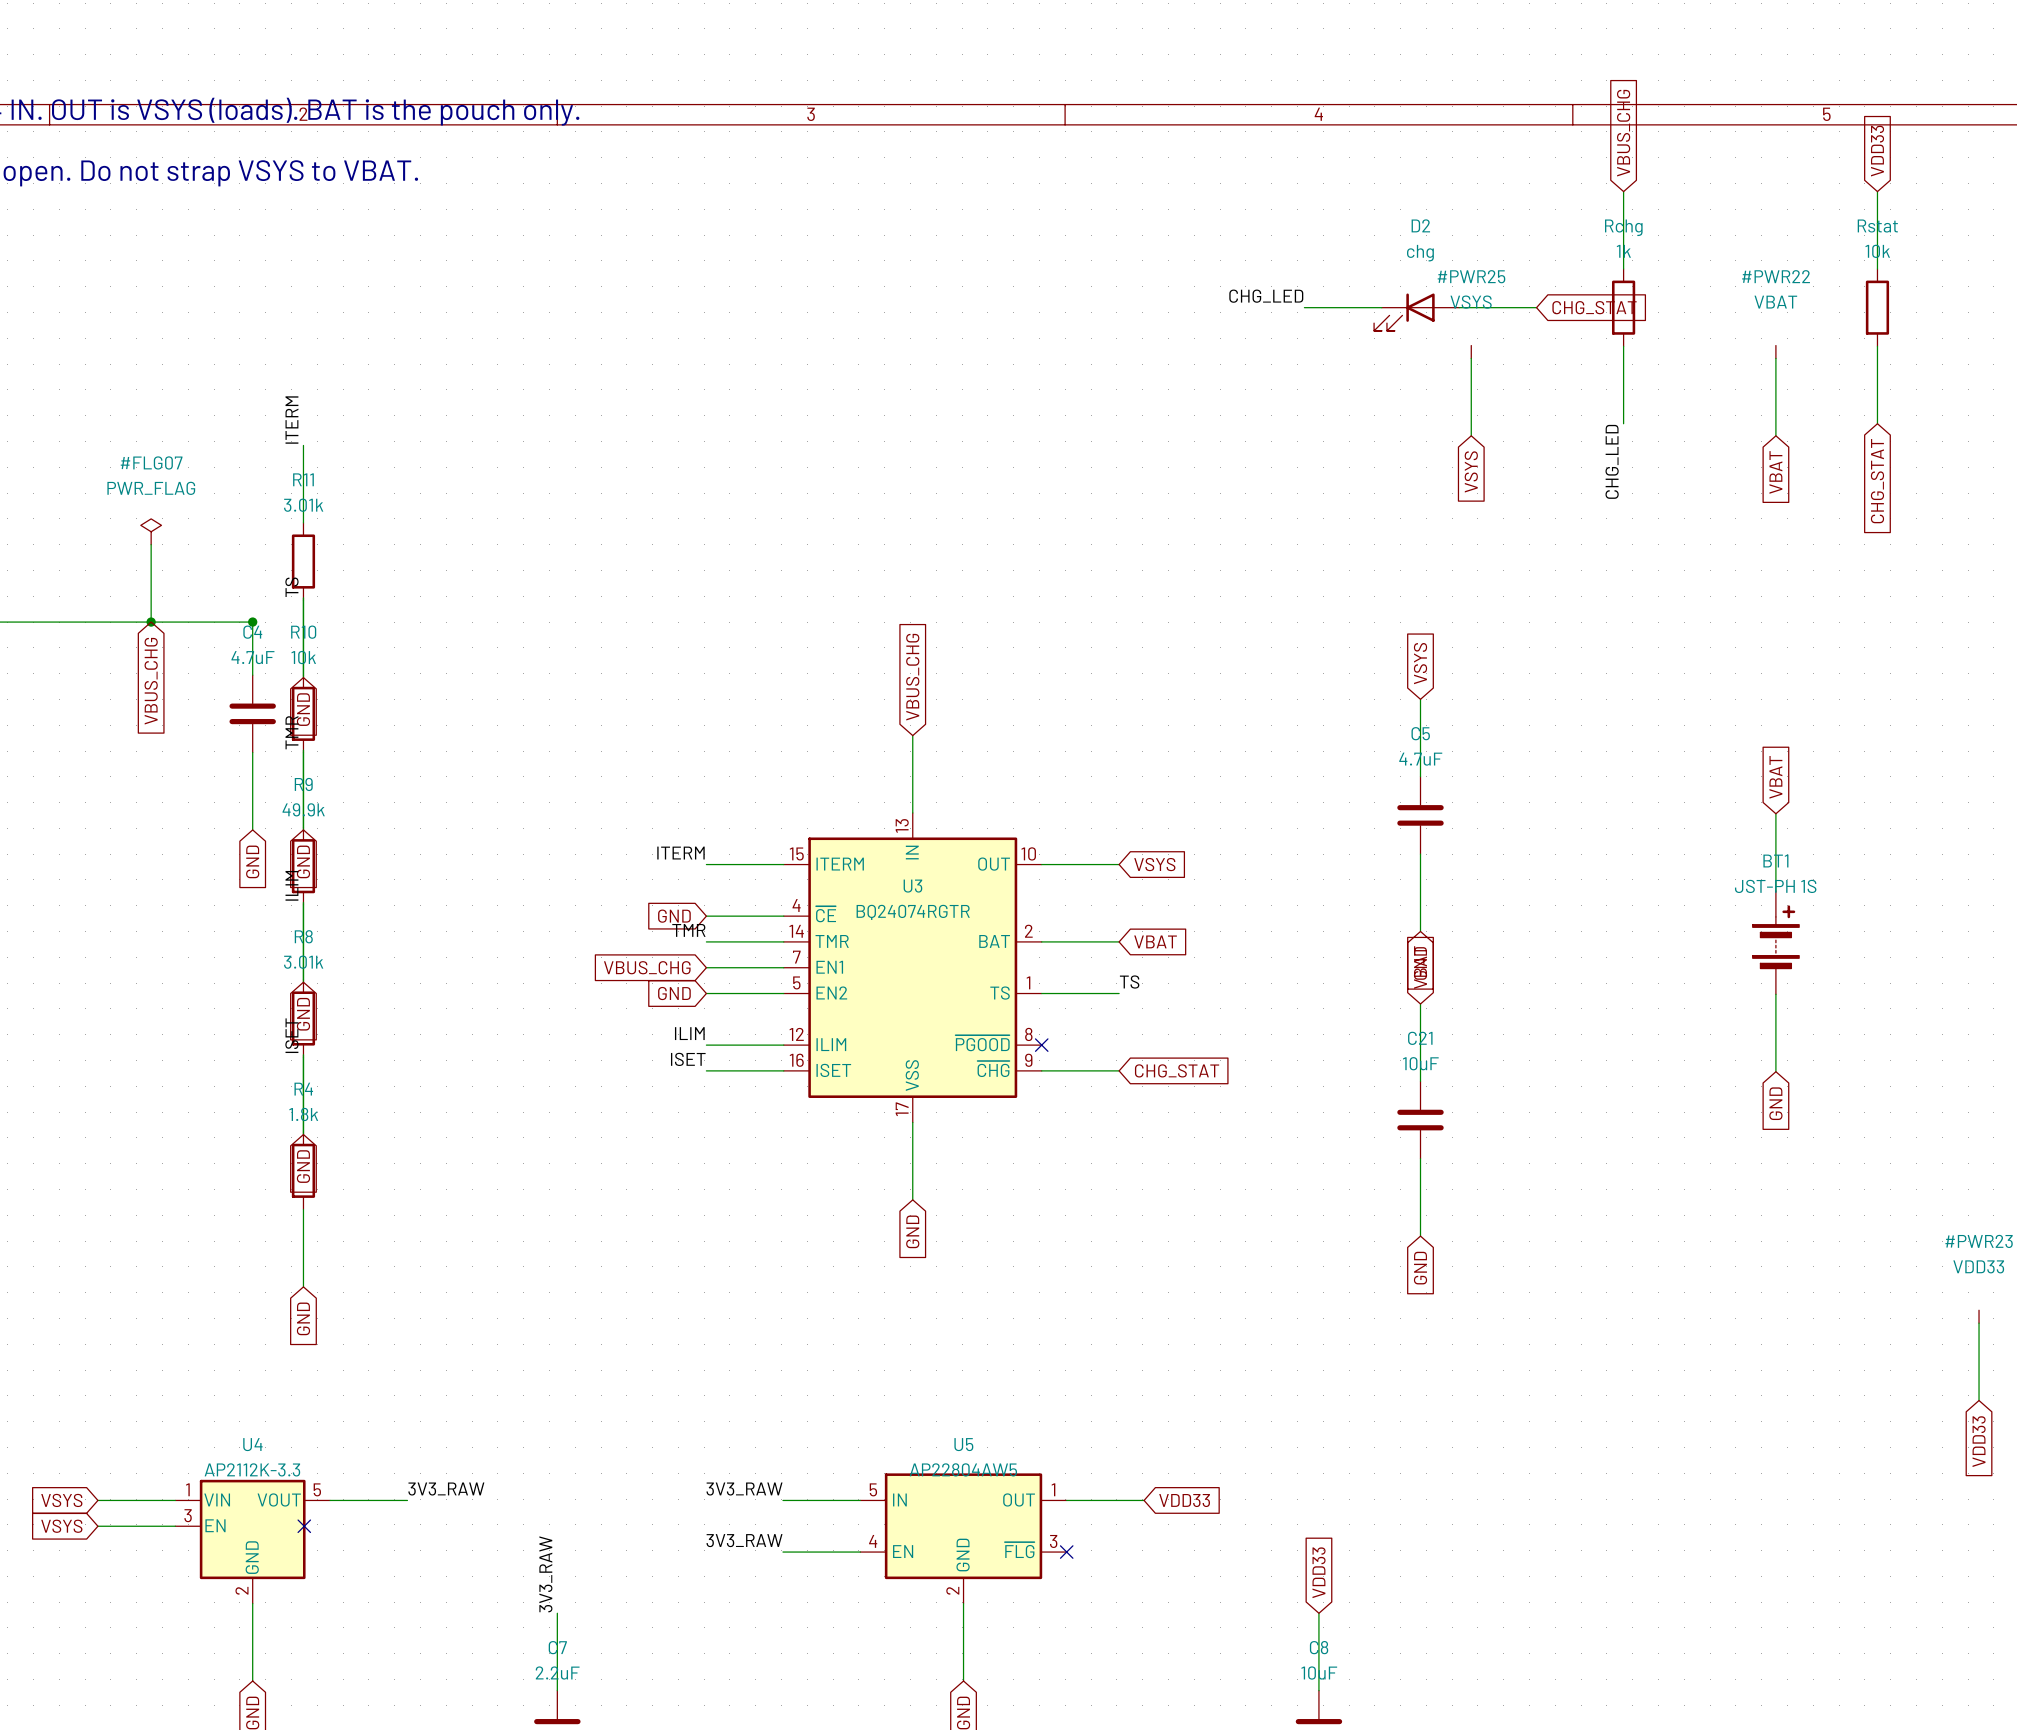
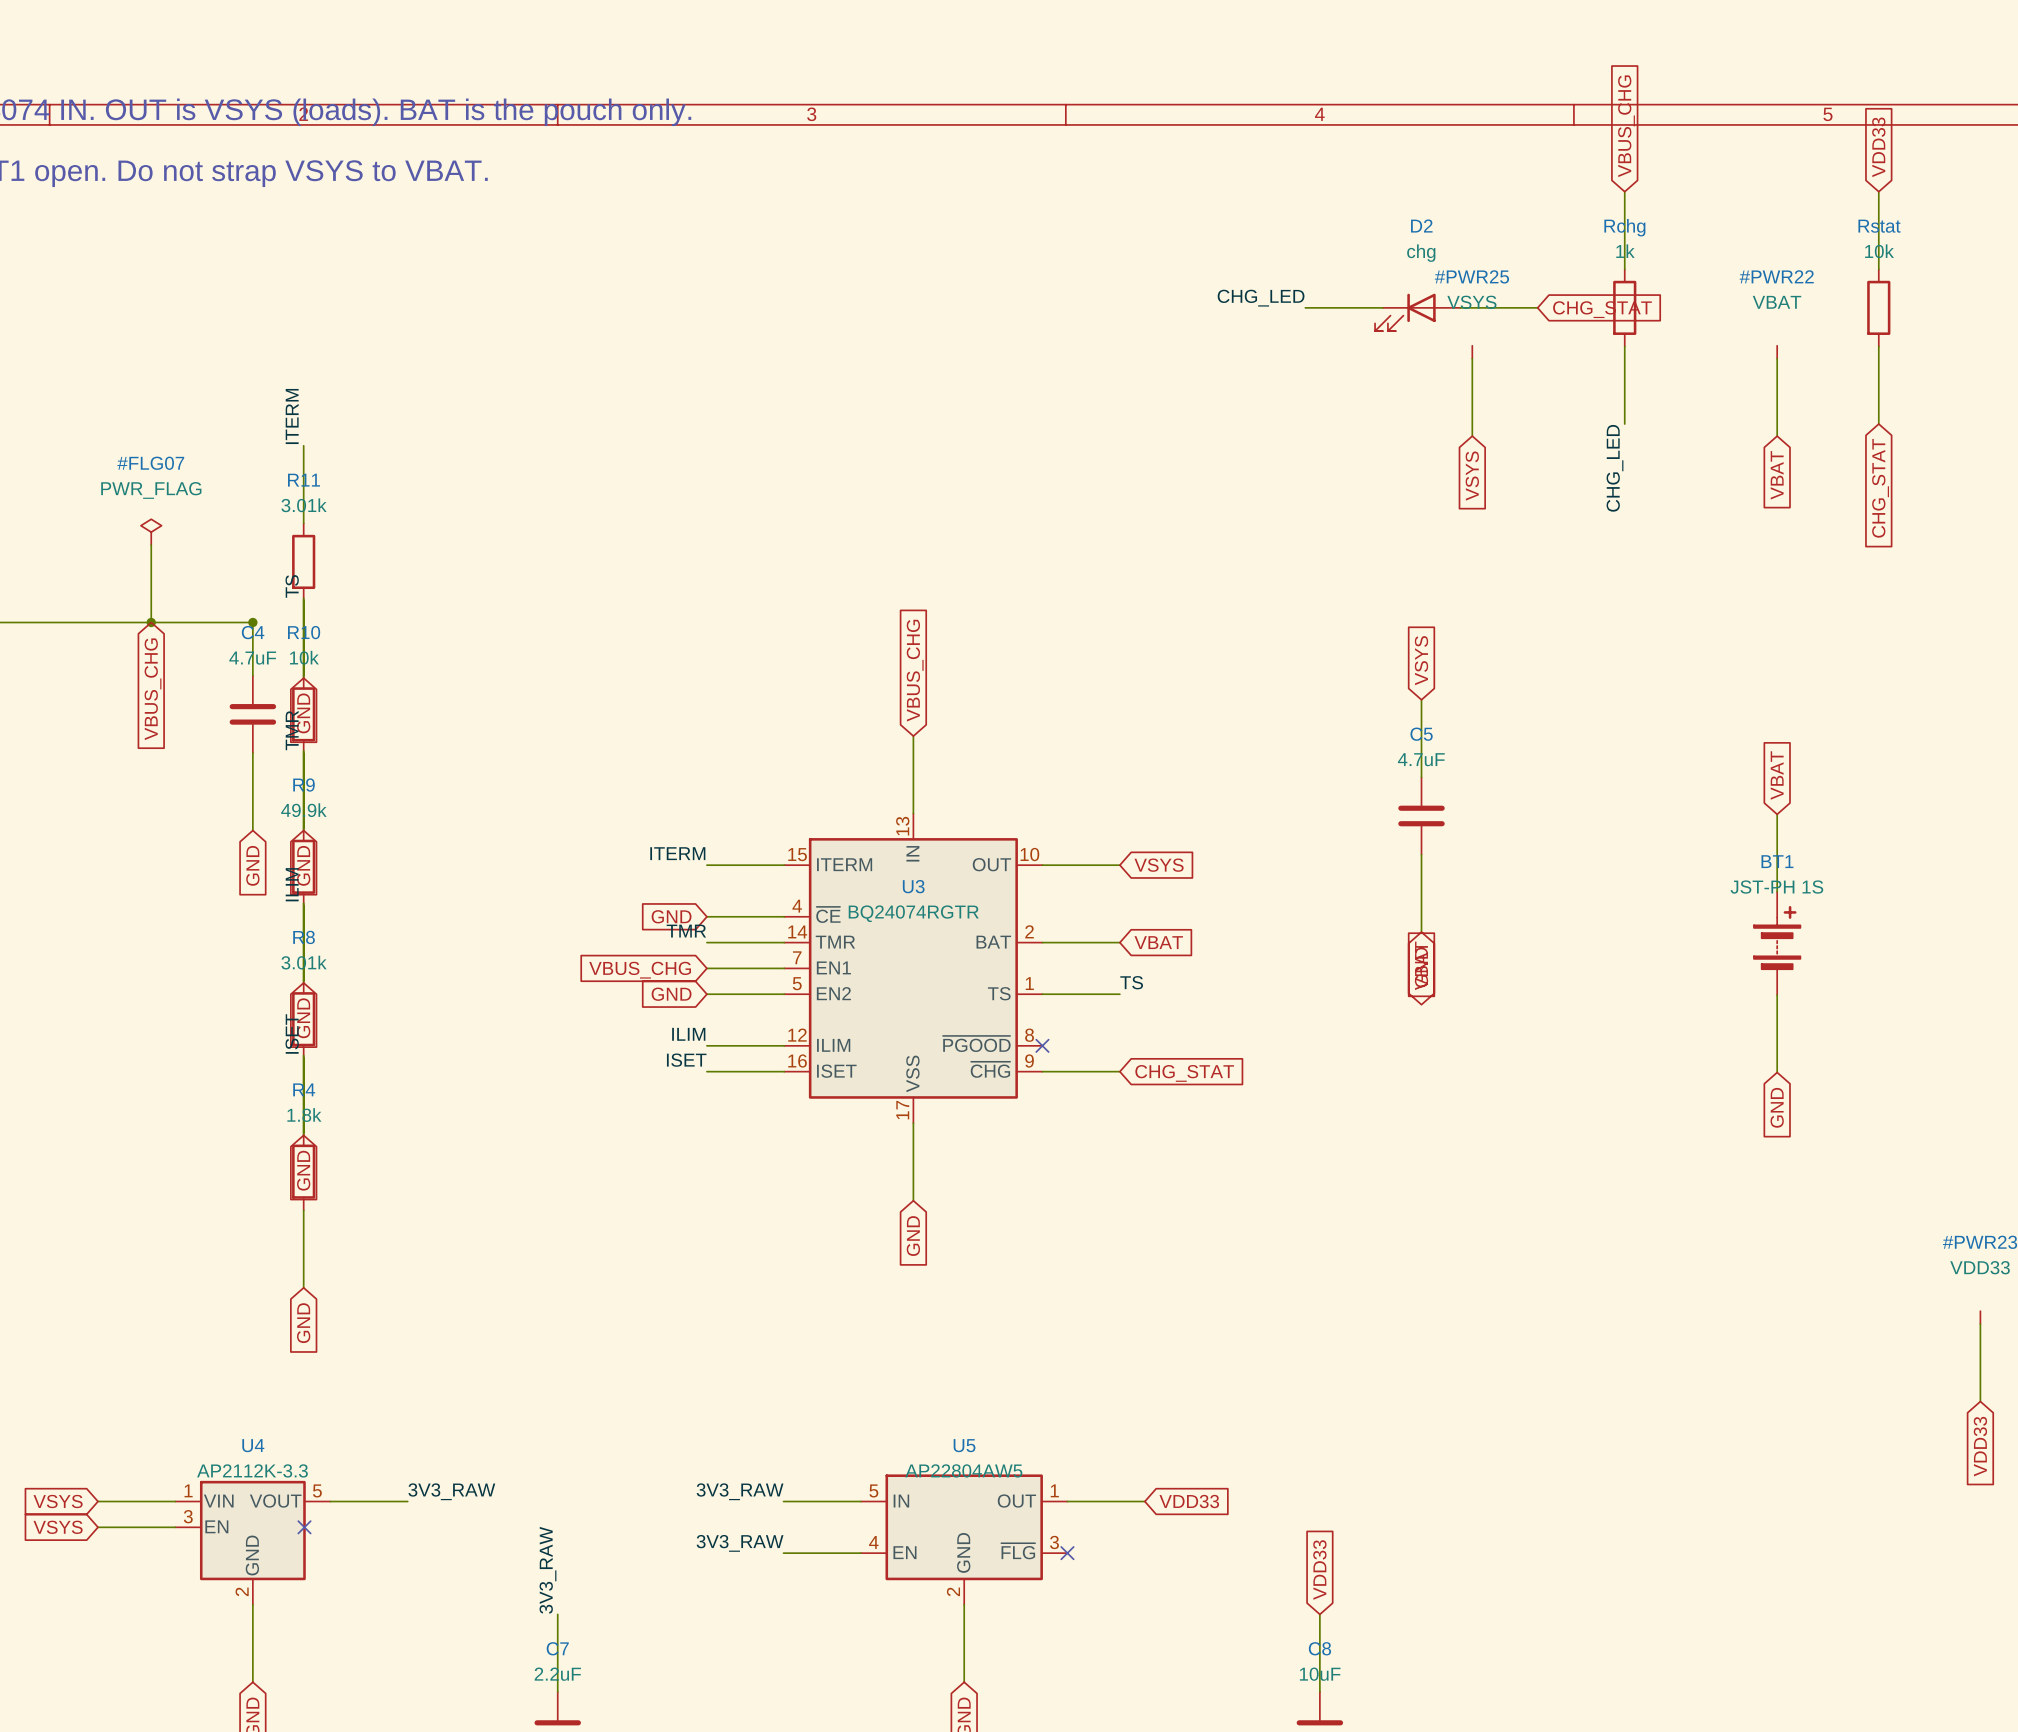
wire: (1420, 1003) (1420, 1081) -> none
C21: 10uF (1420, 1120) -> none
wire: (1420, 1158) (1420, 1236) -> none
global label: GND (1420, 1268) -> none

